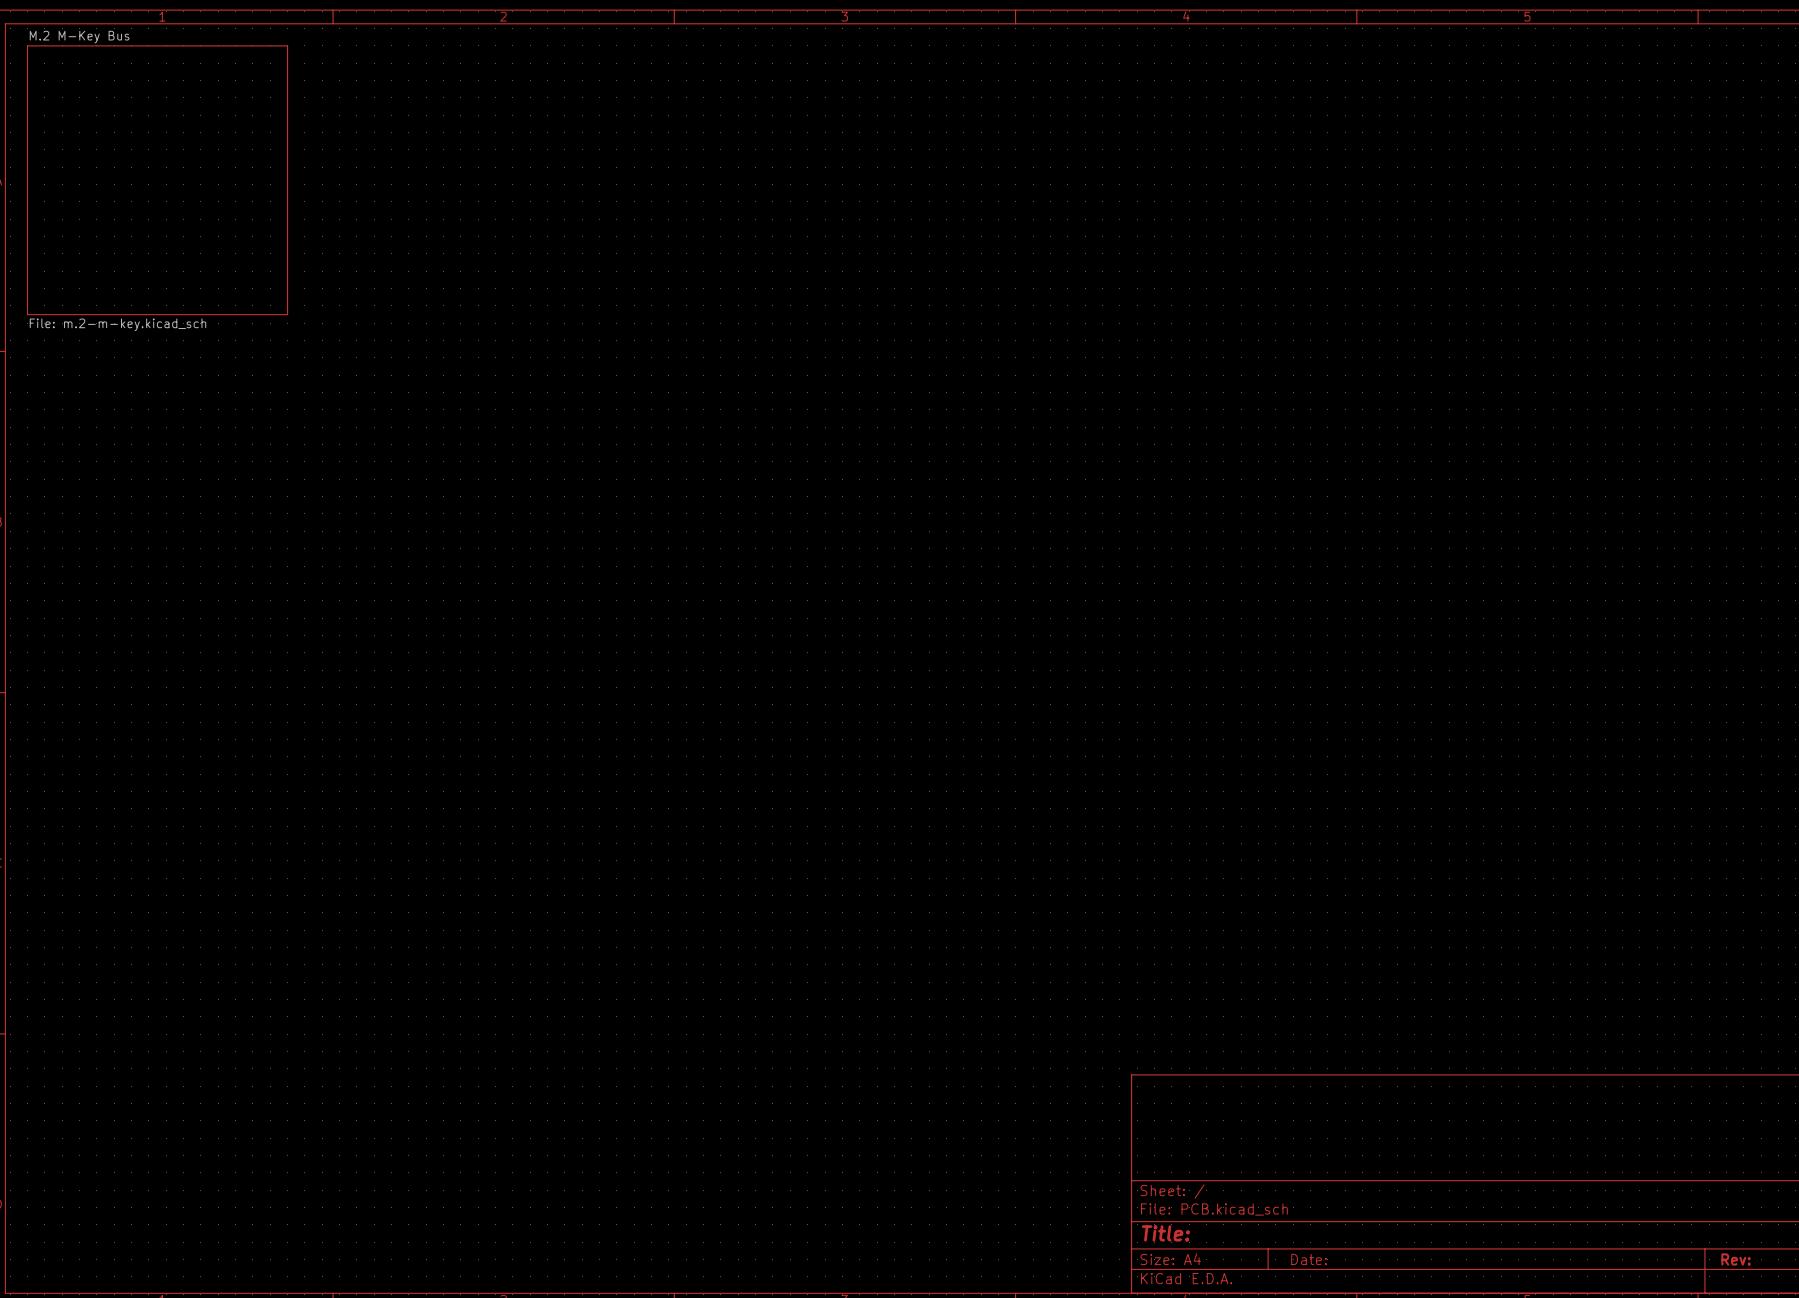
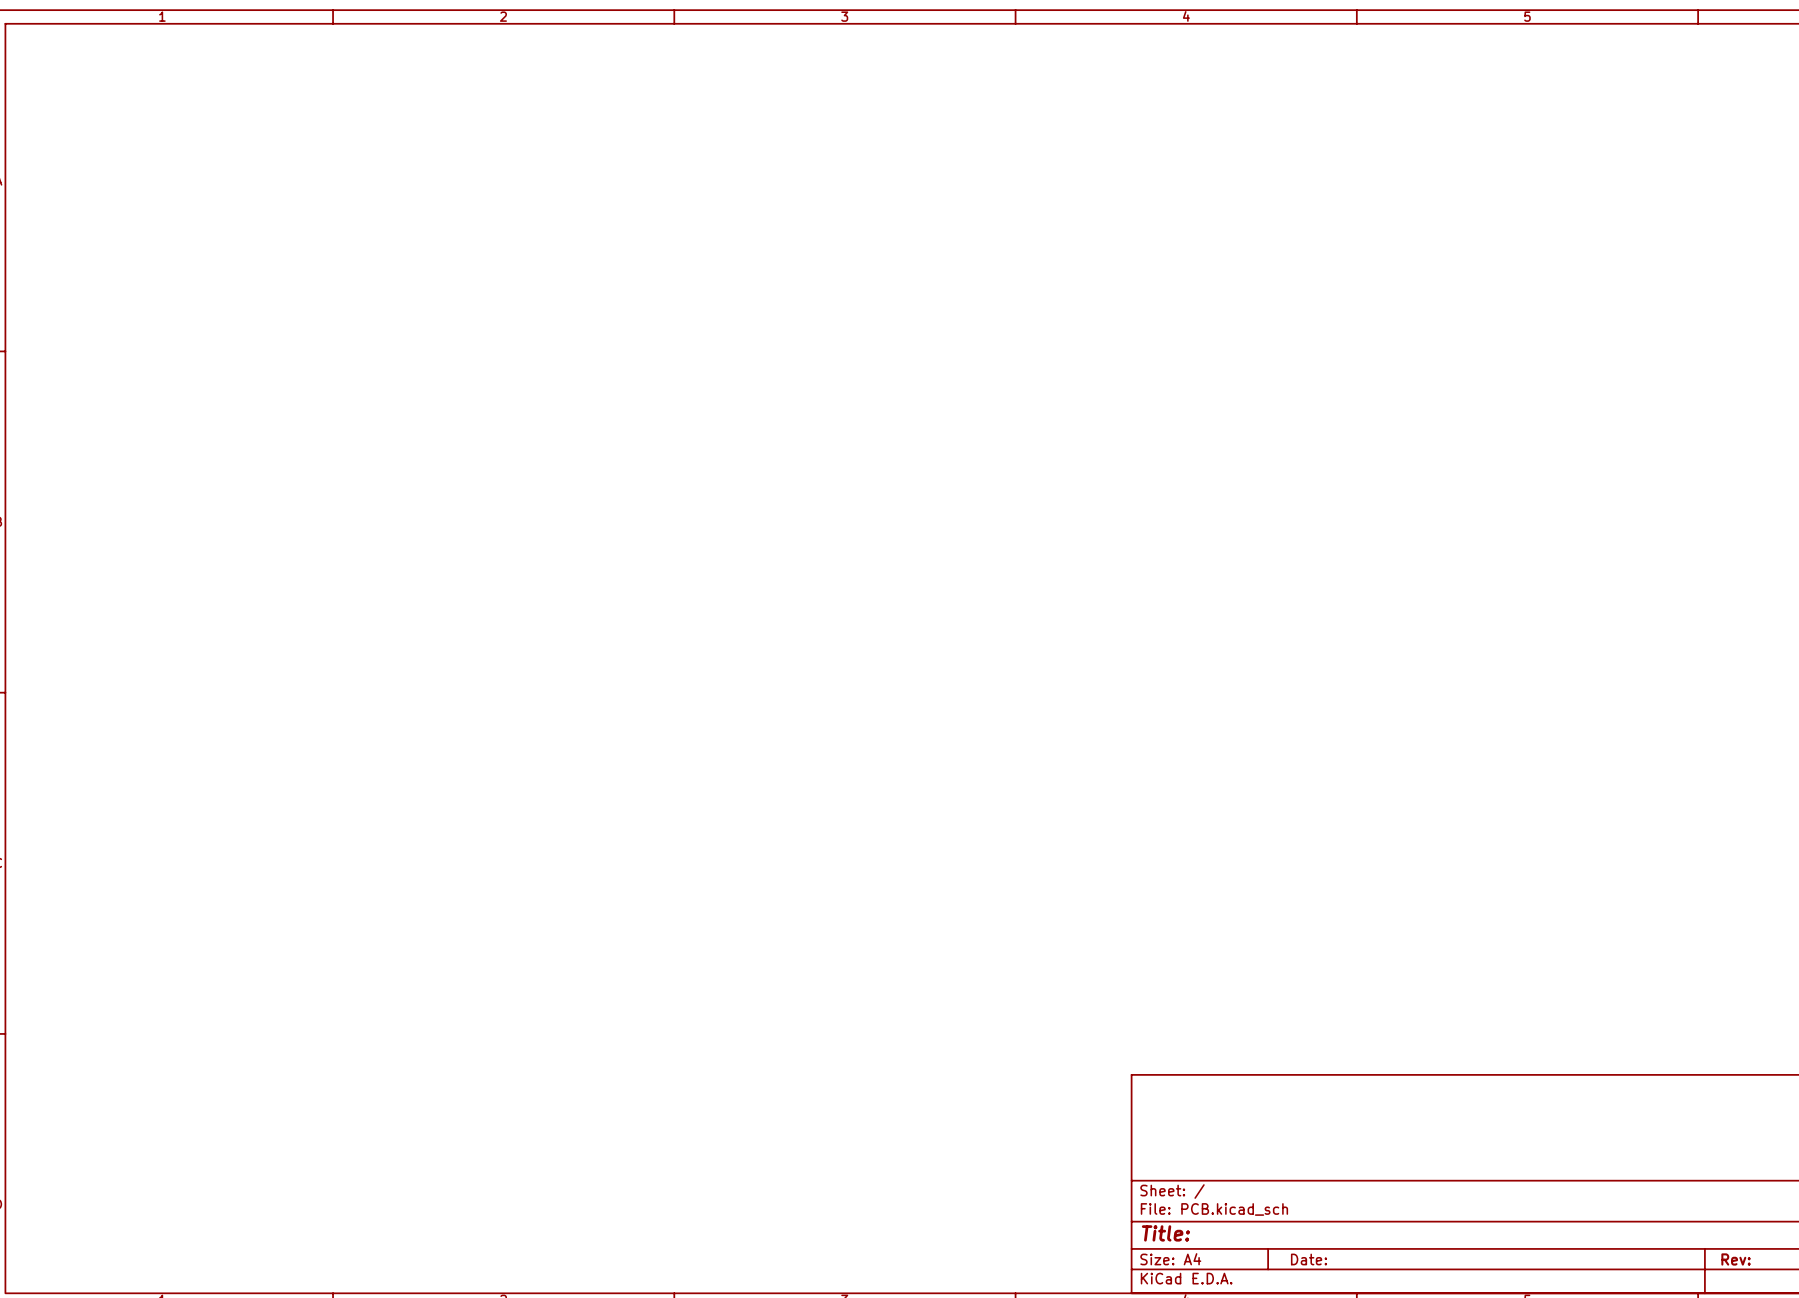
sheet M.2 M-Key Bus: File: m.2-m-key.kicad_sch (157, 180) -> none

